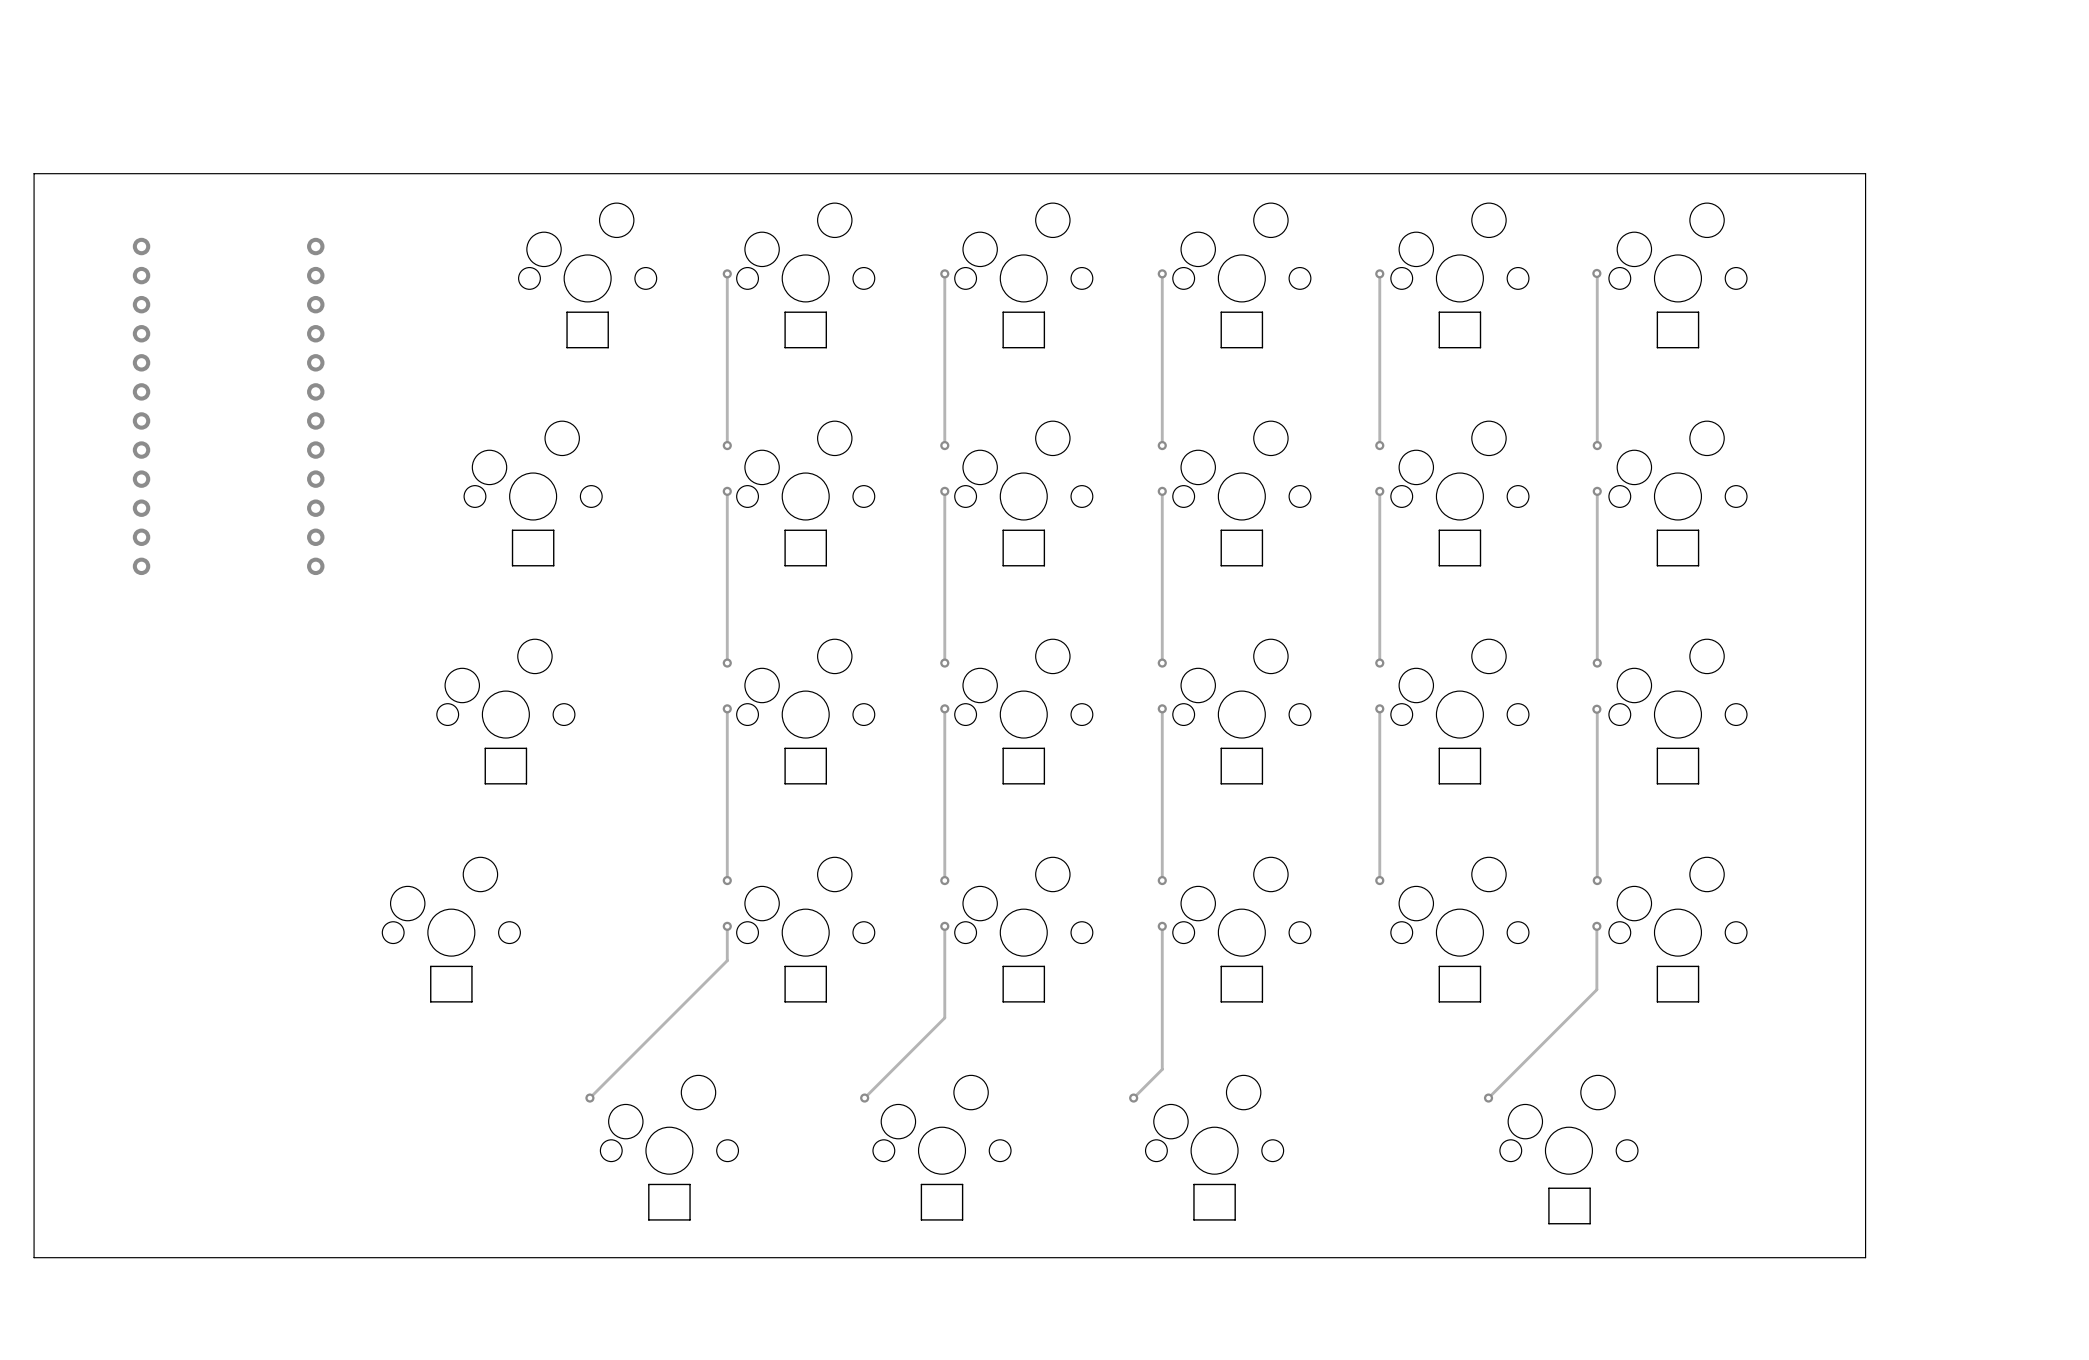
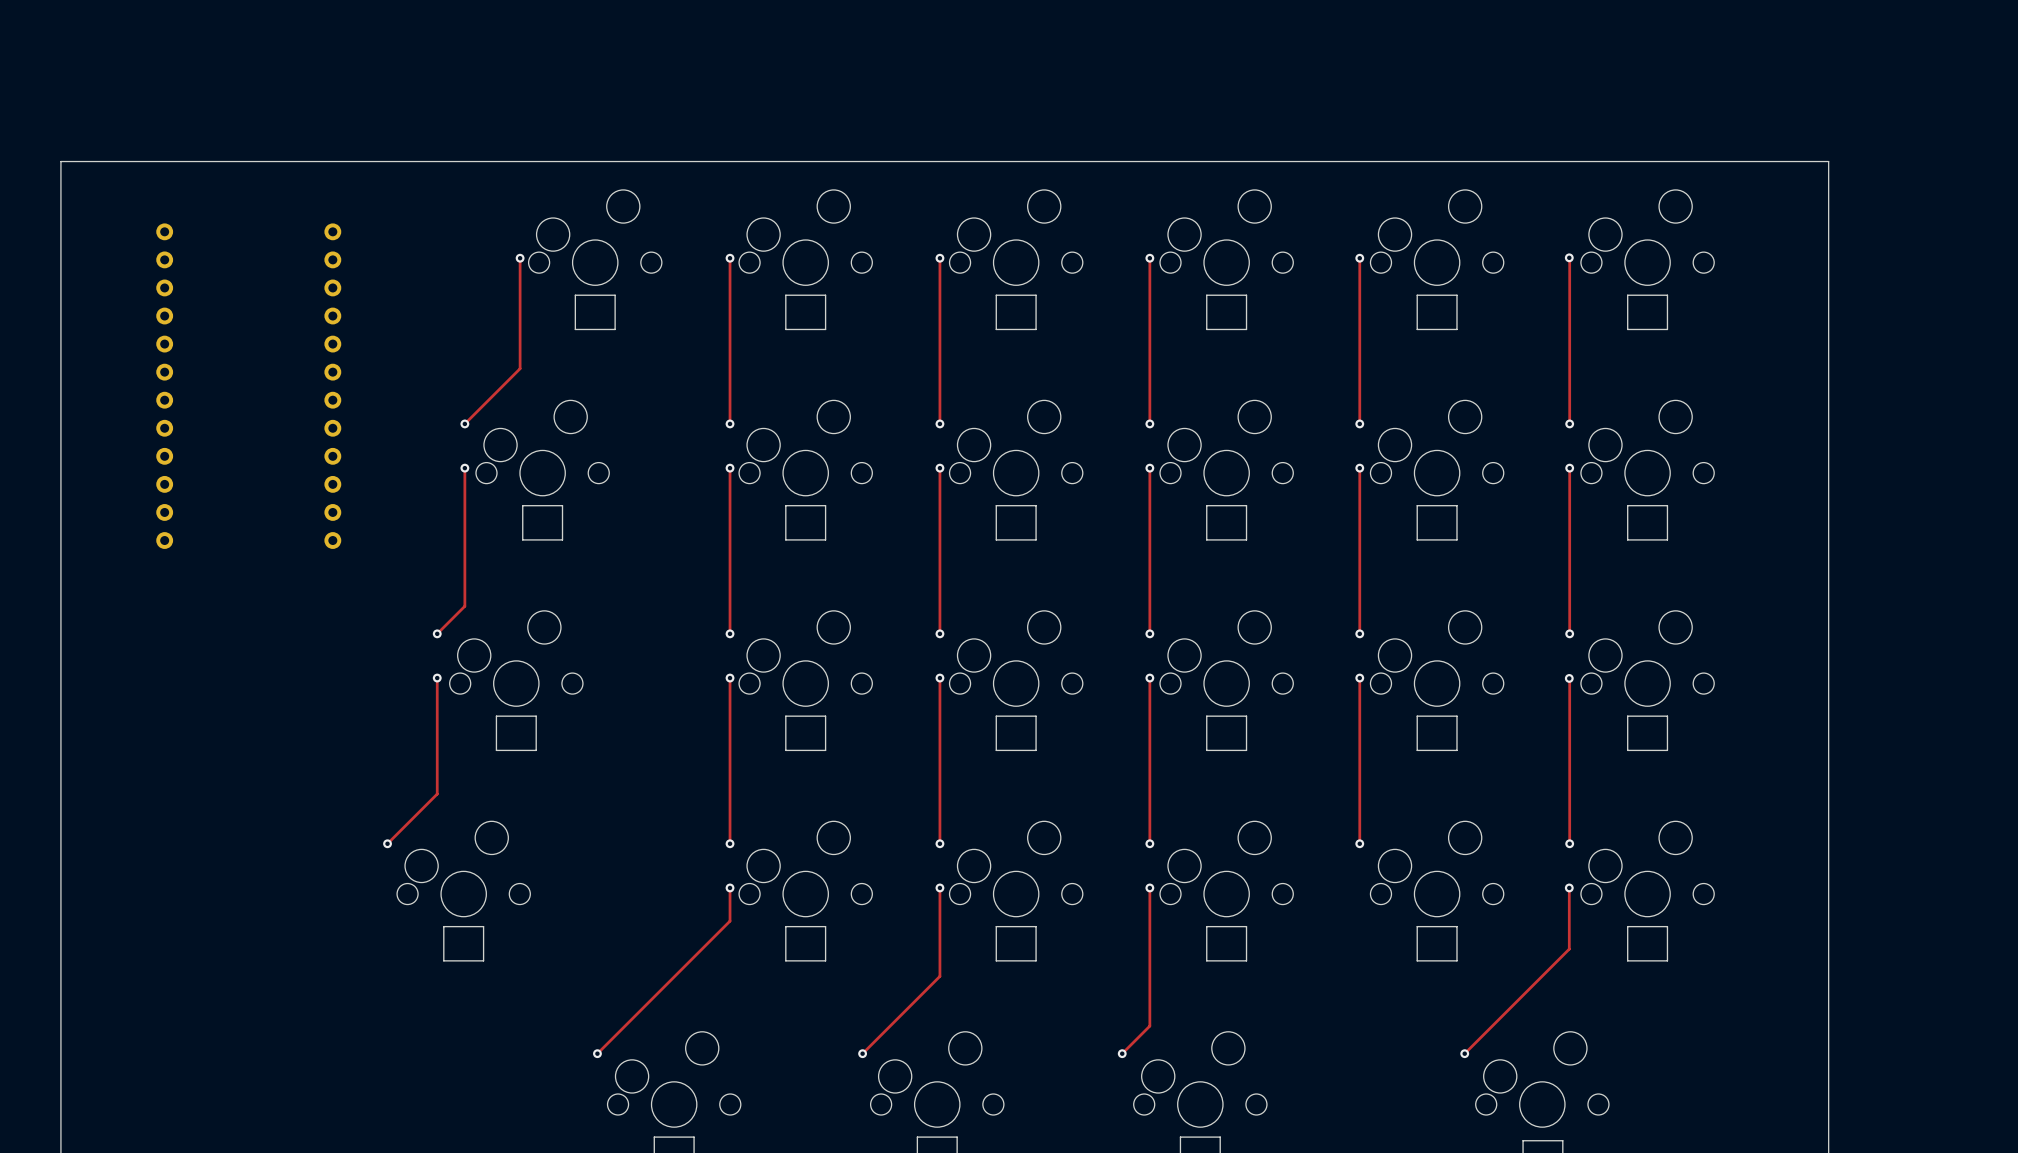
track: none -> (520, 258) (520, 368) (464, 423)
via: none -> (520, 258)
via: none -> (464, 423)
track: none -> (464, 468) (464, 606) (437, 633)
via: none -> (464, 468)
via: none -> (437, 633)
track: none -> (437, 678) (437, 794) (387, 843)
via: none -> (437, 678)
via: none -> (387, 843)

